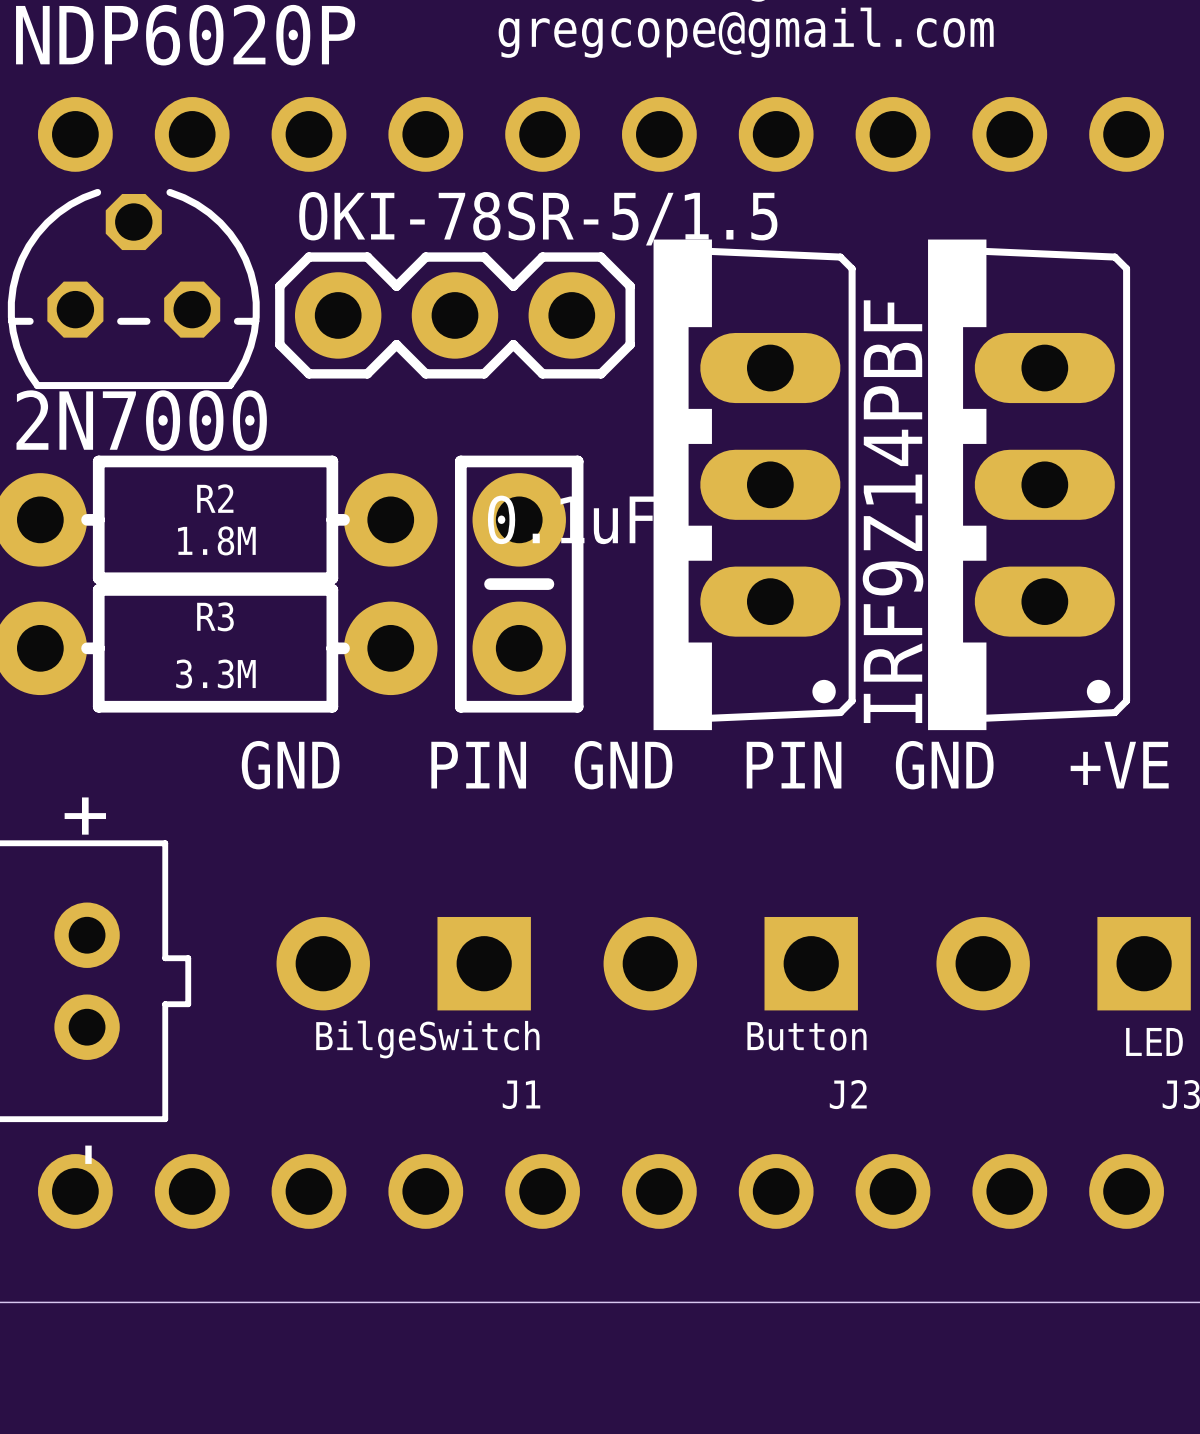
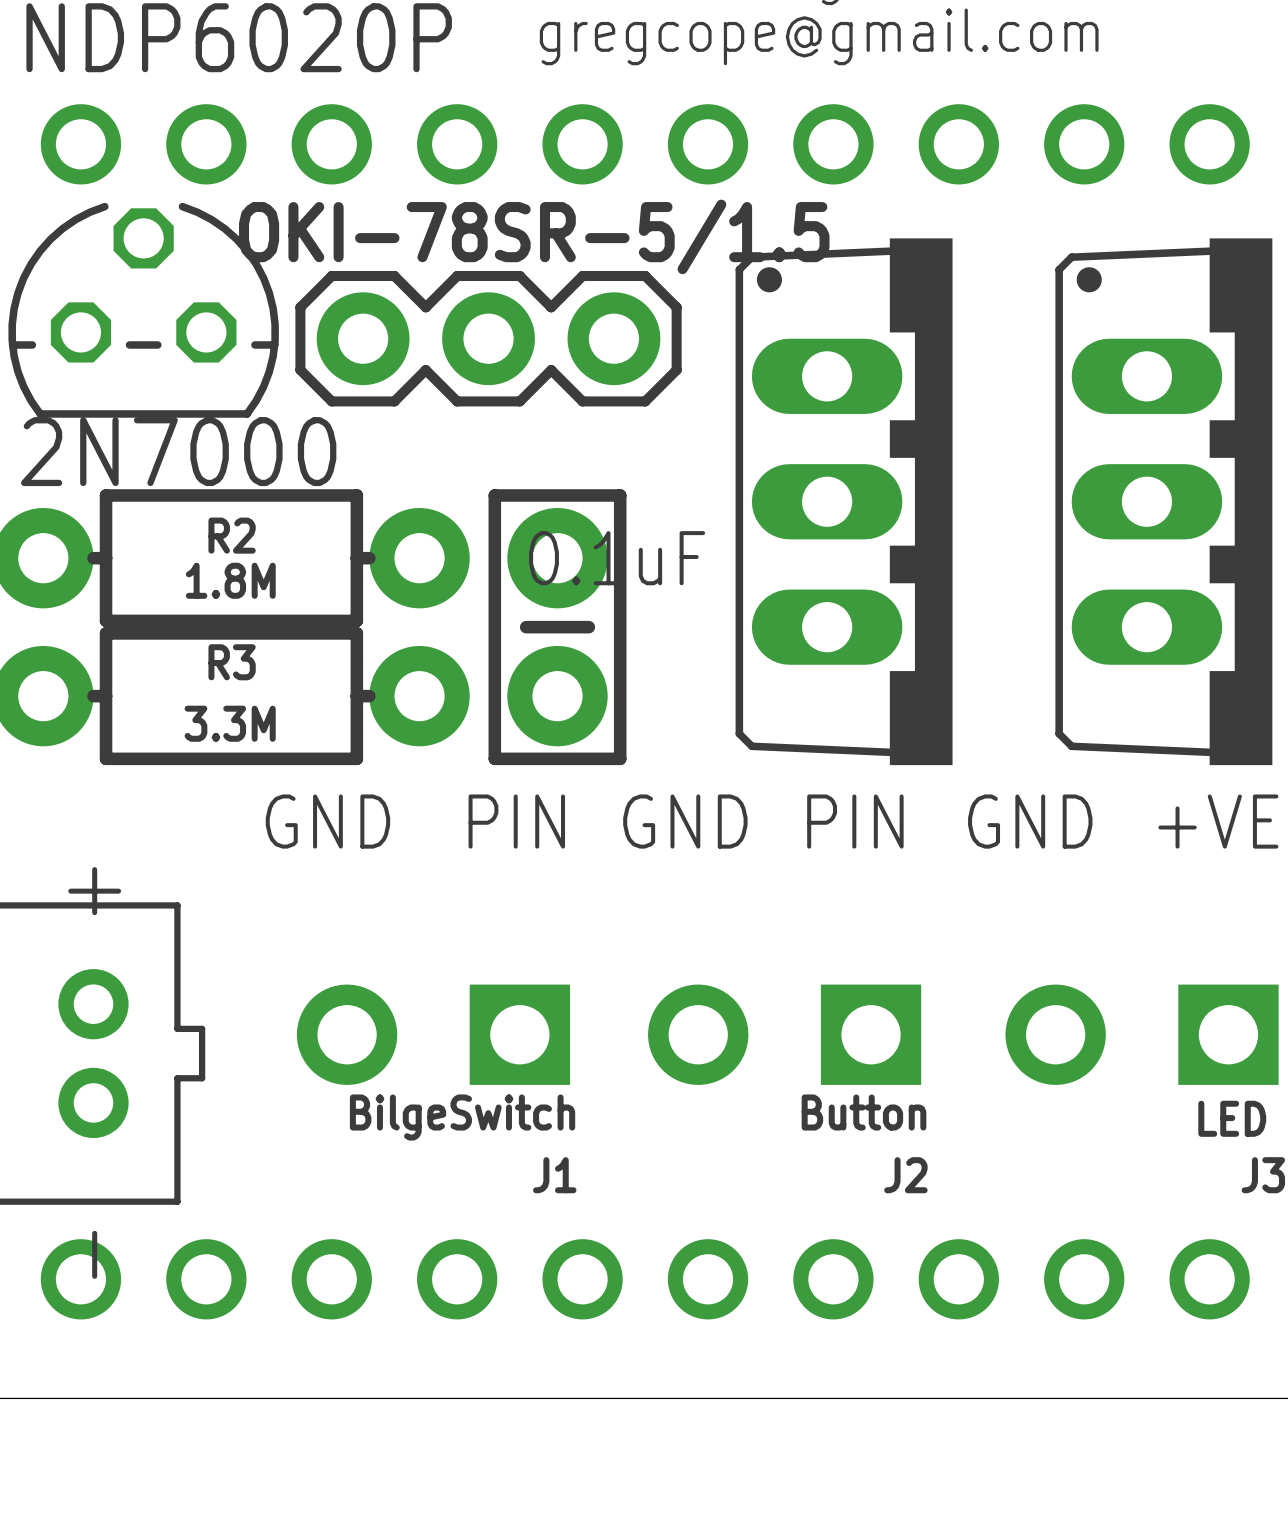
part rotation: 0° (754, 484) -> 180° (844, 501)
part rotation: 0° (1029, 484) -> 180° (1163, 501)
part value: IRF9Z14PBF (893, 511) -> none

